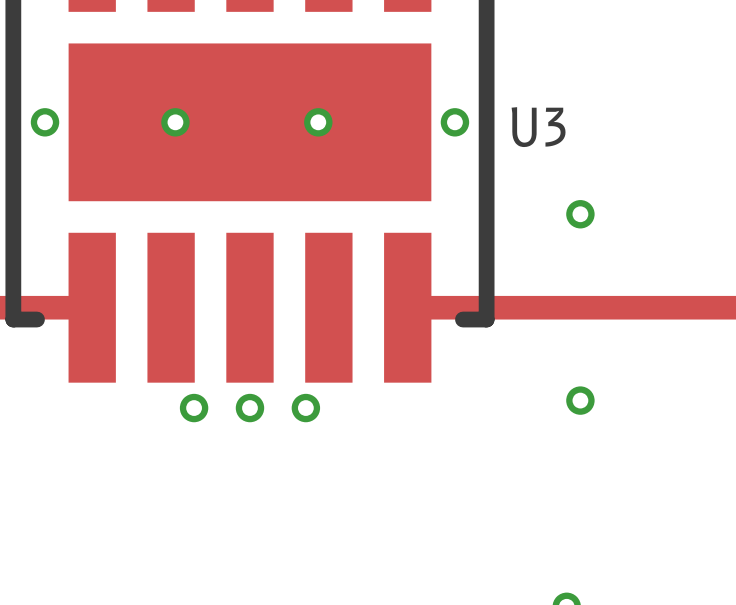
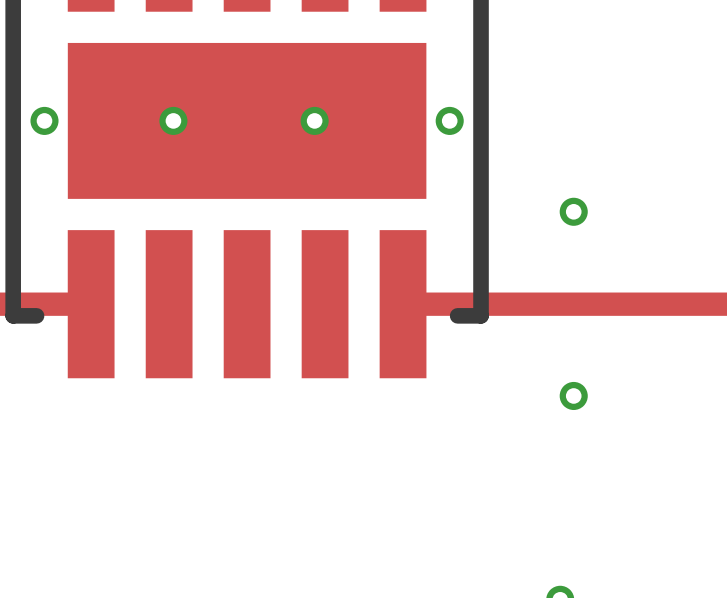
U3 name: U3 (538, 127) -> none
via: (194, 408) -> none
via: (249, 408) -> none
via: (305, 408) -> none

